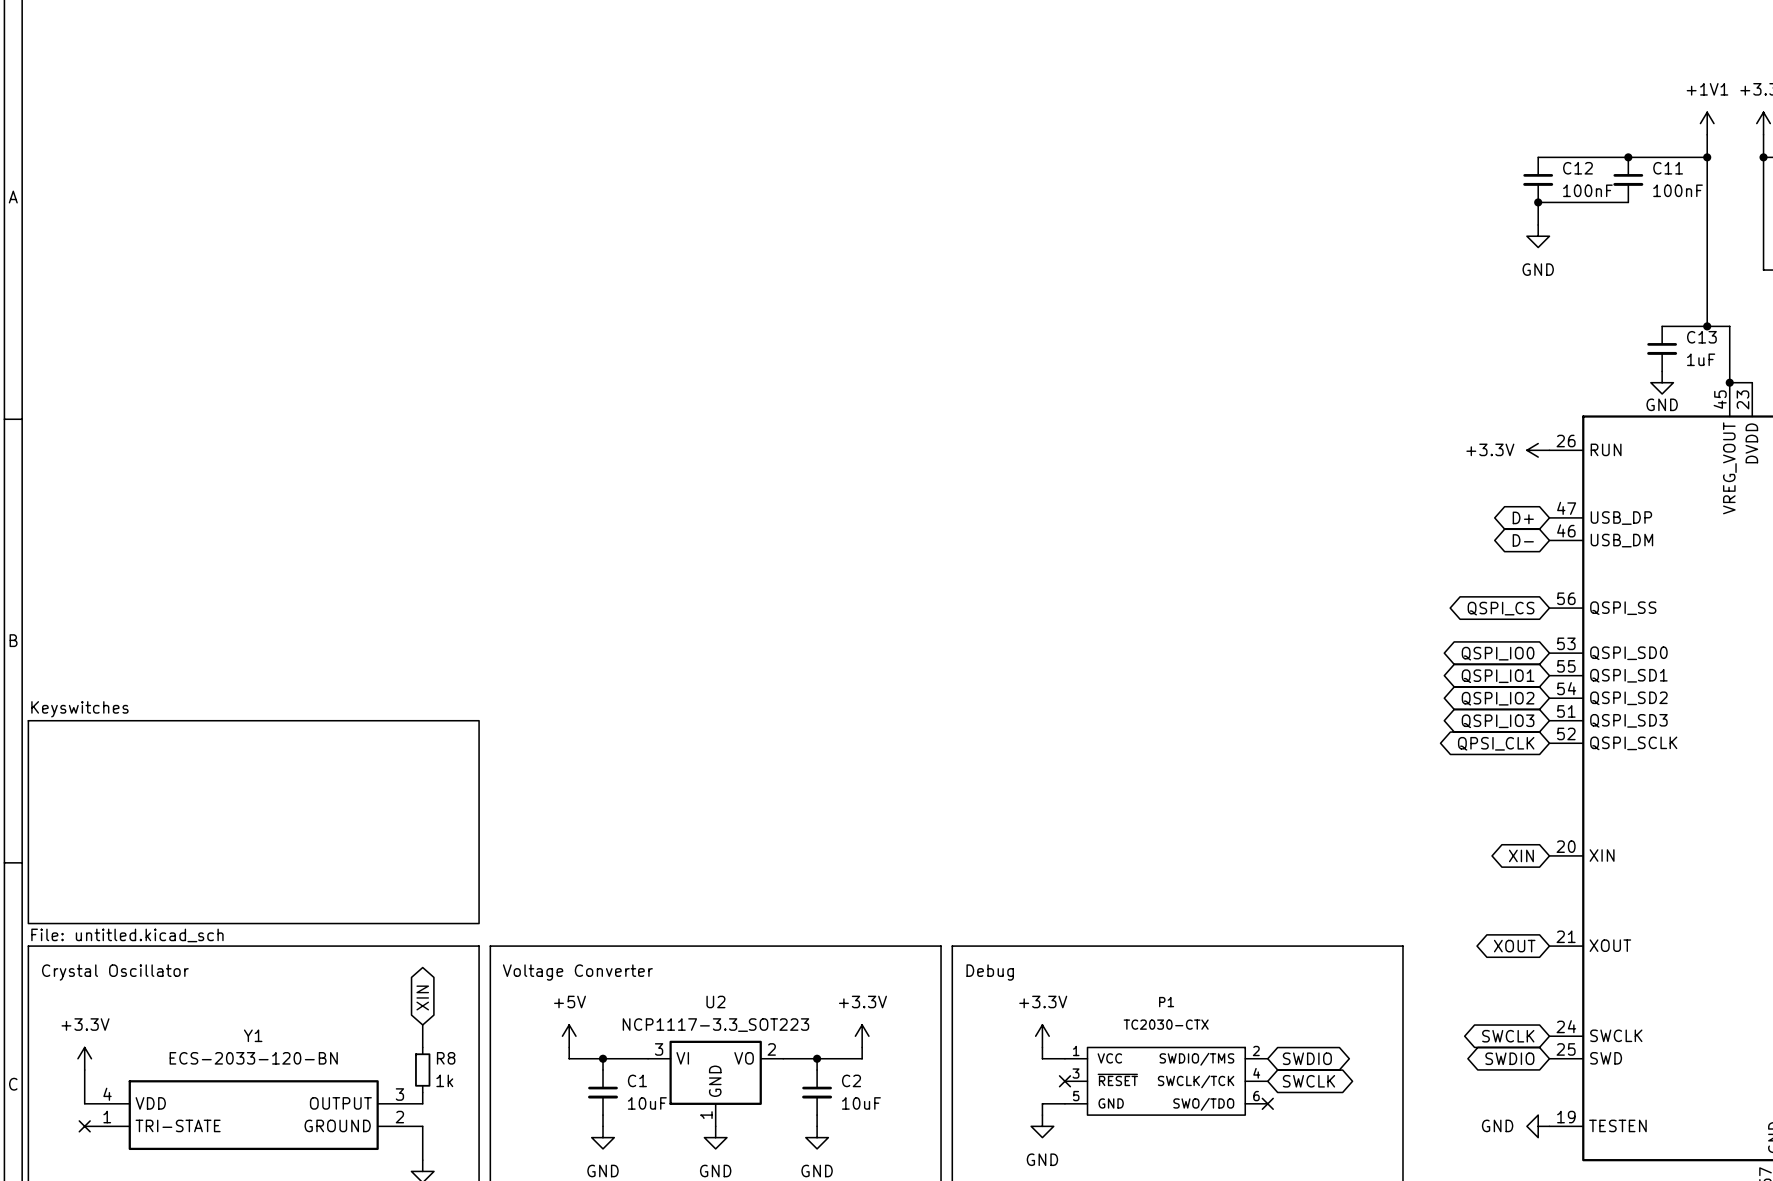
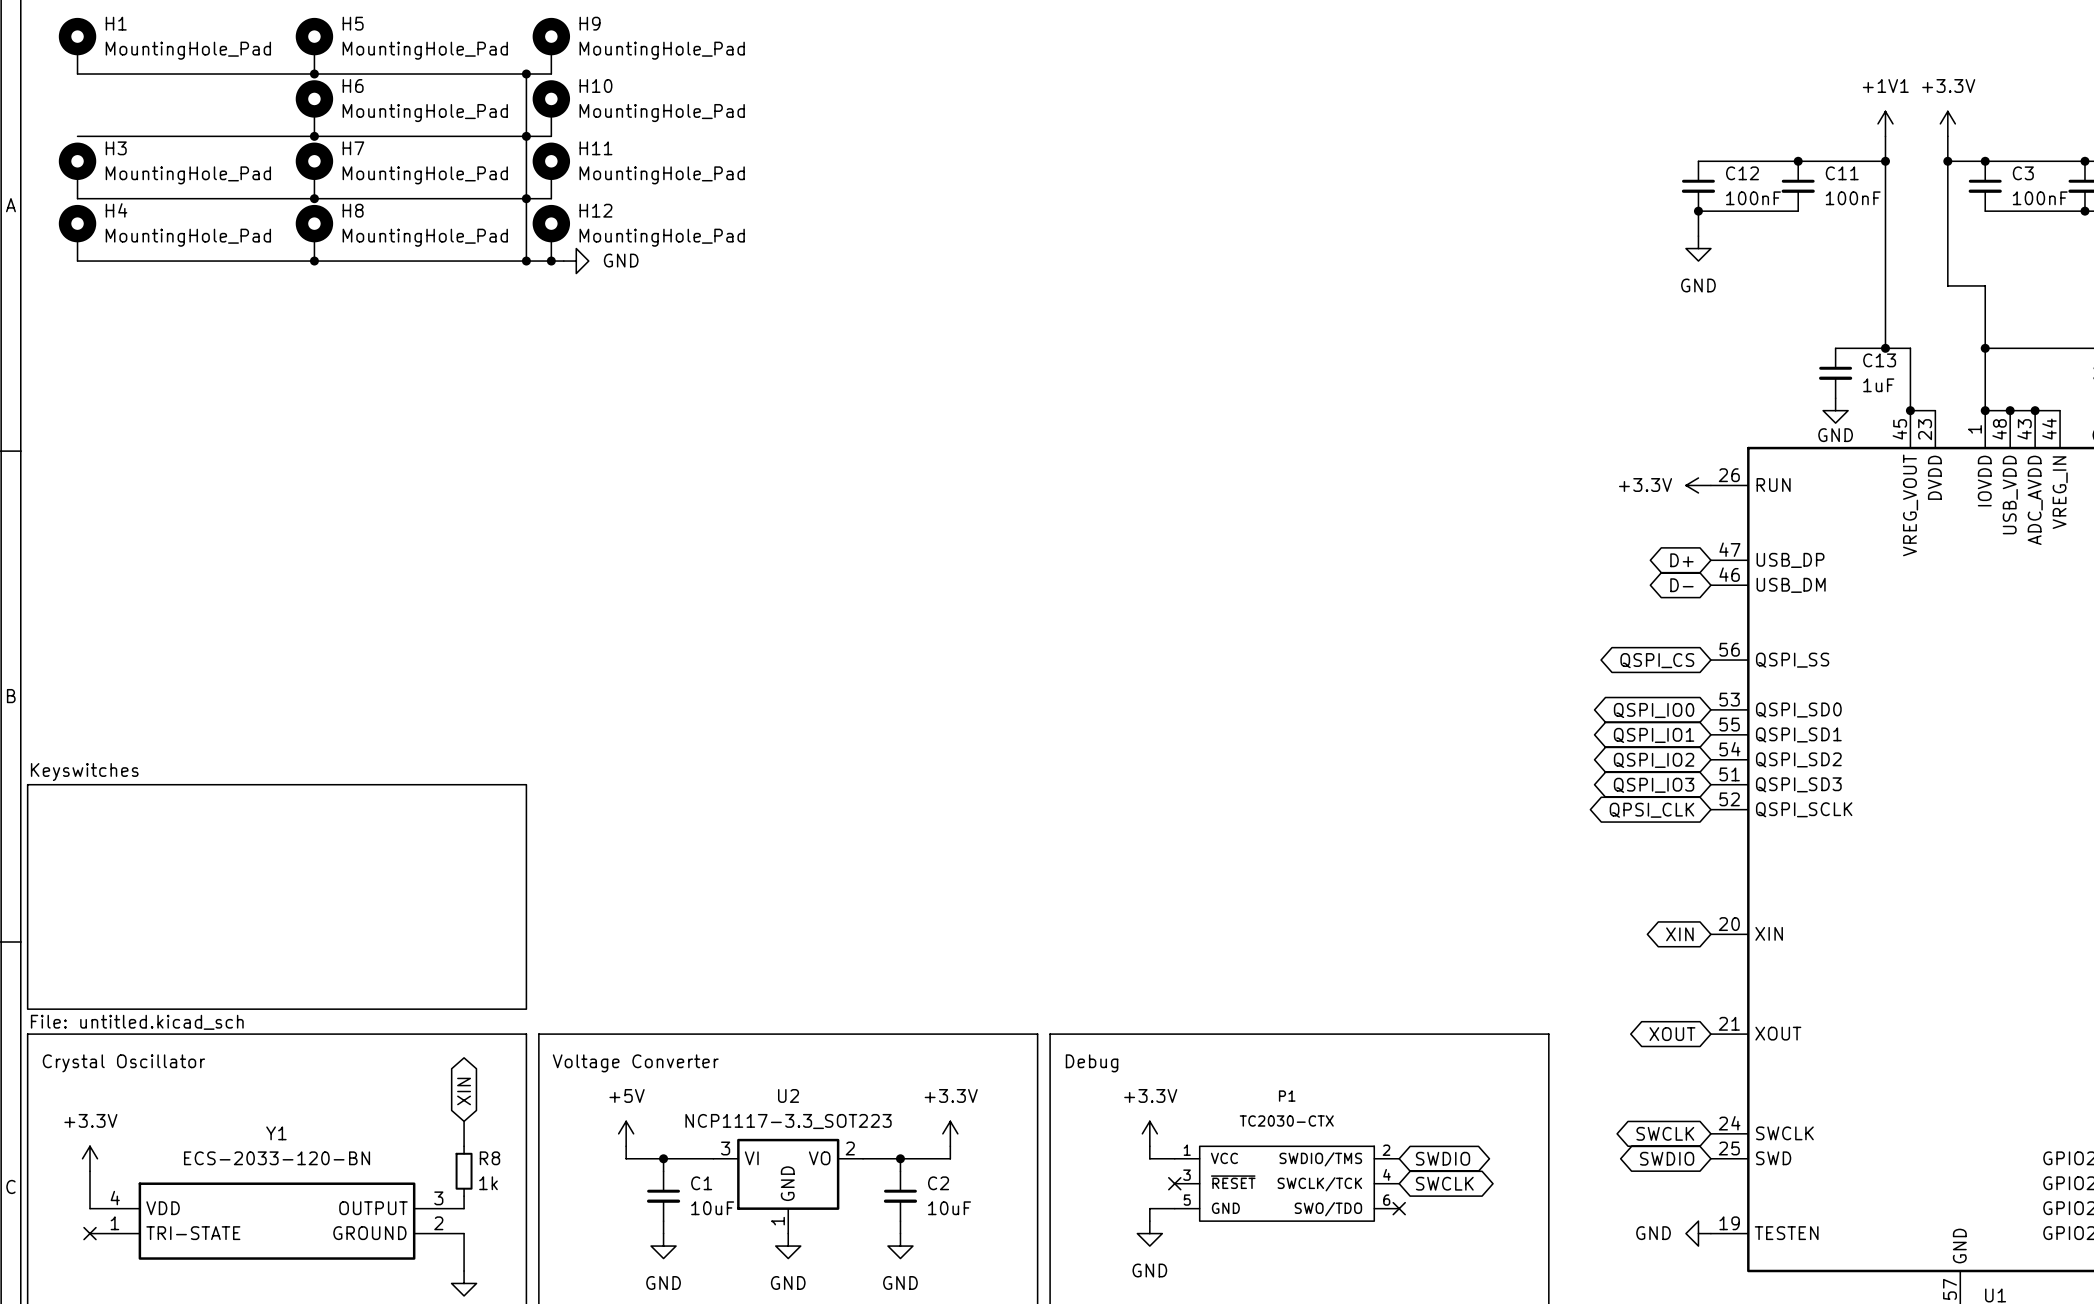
H1: none -> MountingHole_Pad (77, 45)
H5: none -> MountingHole_Pad (314, 45)
H9: none -> MountingHole_Pad (551, 45)
wire: none -> (77, 74) (551, 74)
junction: none -> (314, 74)
wire: none -> (526, 74) (526, 261)
junction: none -> (526, 74)
H6: none -> MountingHole_Pad (314, 108)
H10: none -> MountingHole_Pad (551, 108)
wire: none -> (77, 136) (551, 136)
junction: none -> (314, 136)
junction: none -> (526, 136)
H3: none -> MountingHole_Pad (77, 170)
H7: none -> MountingHole_Pad (314, 170)
H11: none -> MountingHole_Pad (551, 170)
wire: none -> (77, 198) (551, 198)
junction: none -> (314, 198)
junction: none -> (526, 198)
H4: none -> MountingHole_Pad (77, 232)
H8: none -> MountingHole_Pad (314, 232)
H12: none -> MountingHole_Pad (551, 232)
wire: none -> (77, 261) (563, 261)
junction: none -> (314, 261)
junction: none -> (526, 261)
junction: none -> (551, 261)
power symbol: none -> GND (576, 261)

